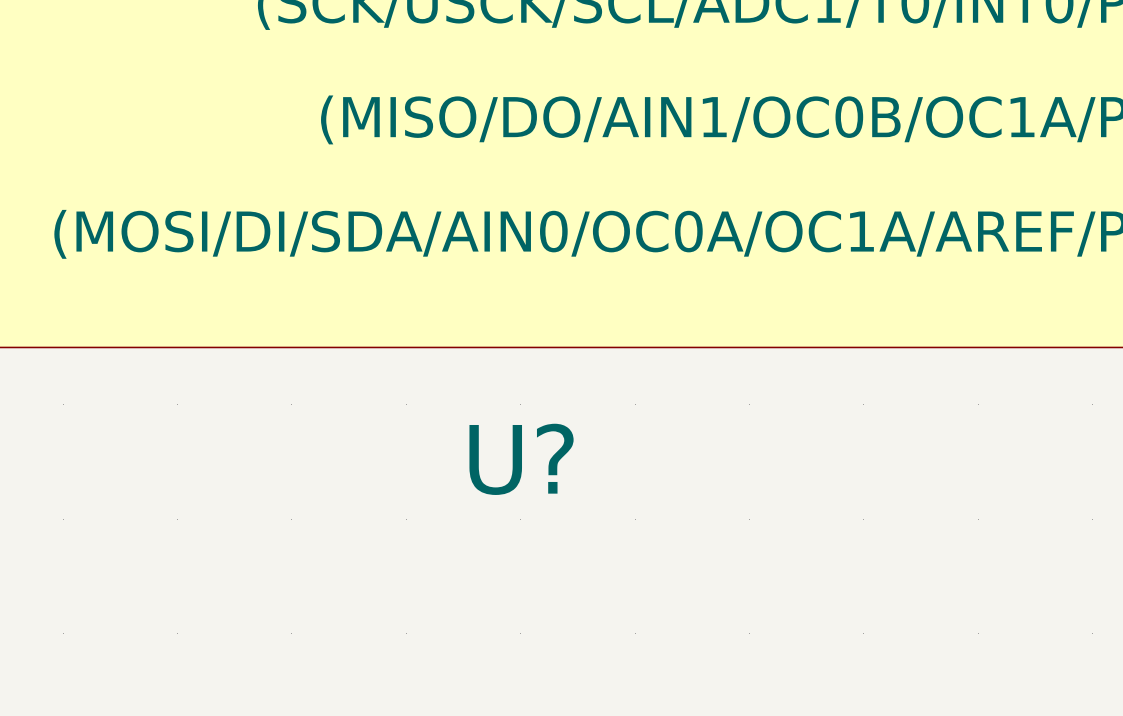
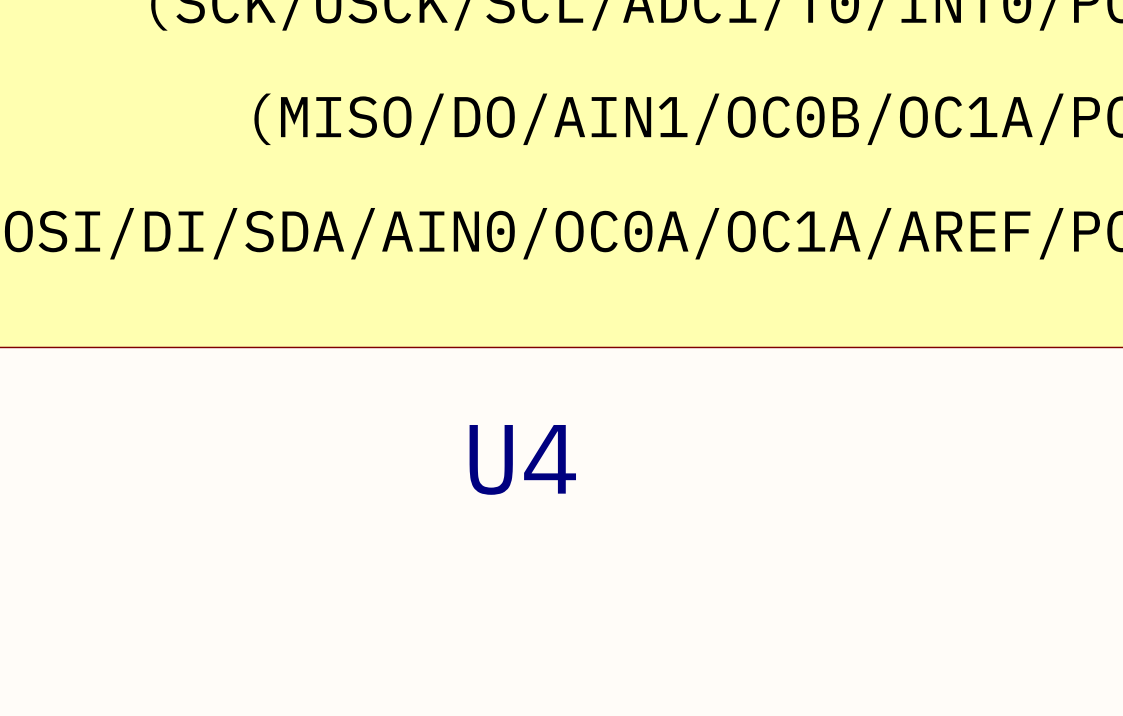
U? name: U? (521, 459) -> U4 (522, 459)

